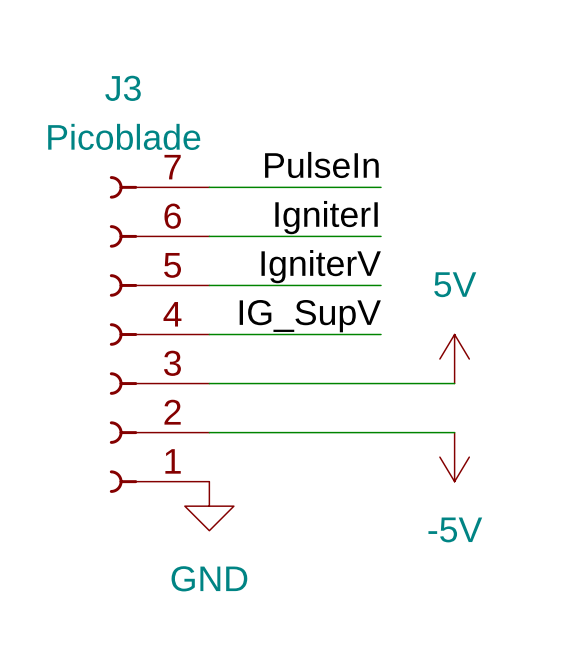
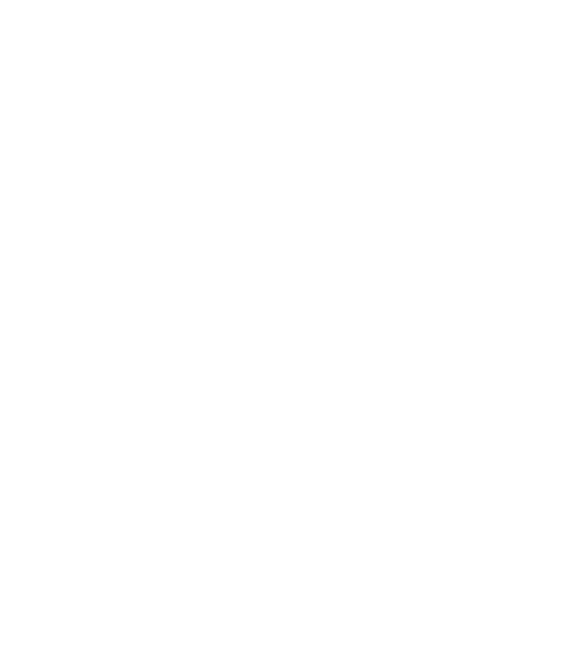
label: PulseIn (321, 165) -> none
wire: (209, 187) (381, 187) -> none
label: IgniterI (326, 217) -> none
wire: (209, 236) (381, 236) -> none
label: IgniterV (321, 266) -> none
wire: (209, 285) (381, 285) -> none
label: IG_SupV (310, 316) -> none
J3: Picoblade (159, 334) -> none
wire: (209, 334) (381, 334) -> none
power symbol: 5V (454, 359) -> none
wire: (209, 383) (454, 383) -> none
wire: (209, 432) (454, 432) -> none
power symbol: -5V (454, 457) -> none
power symbol: GND (209, 506) -> none

